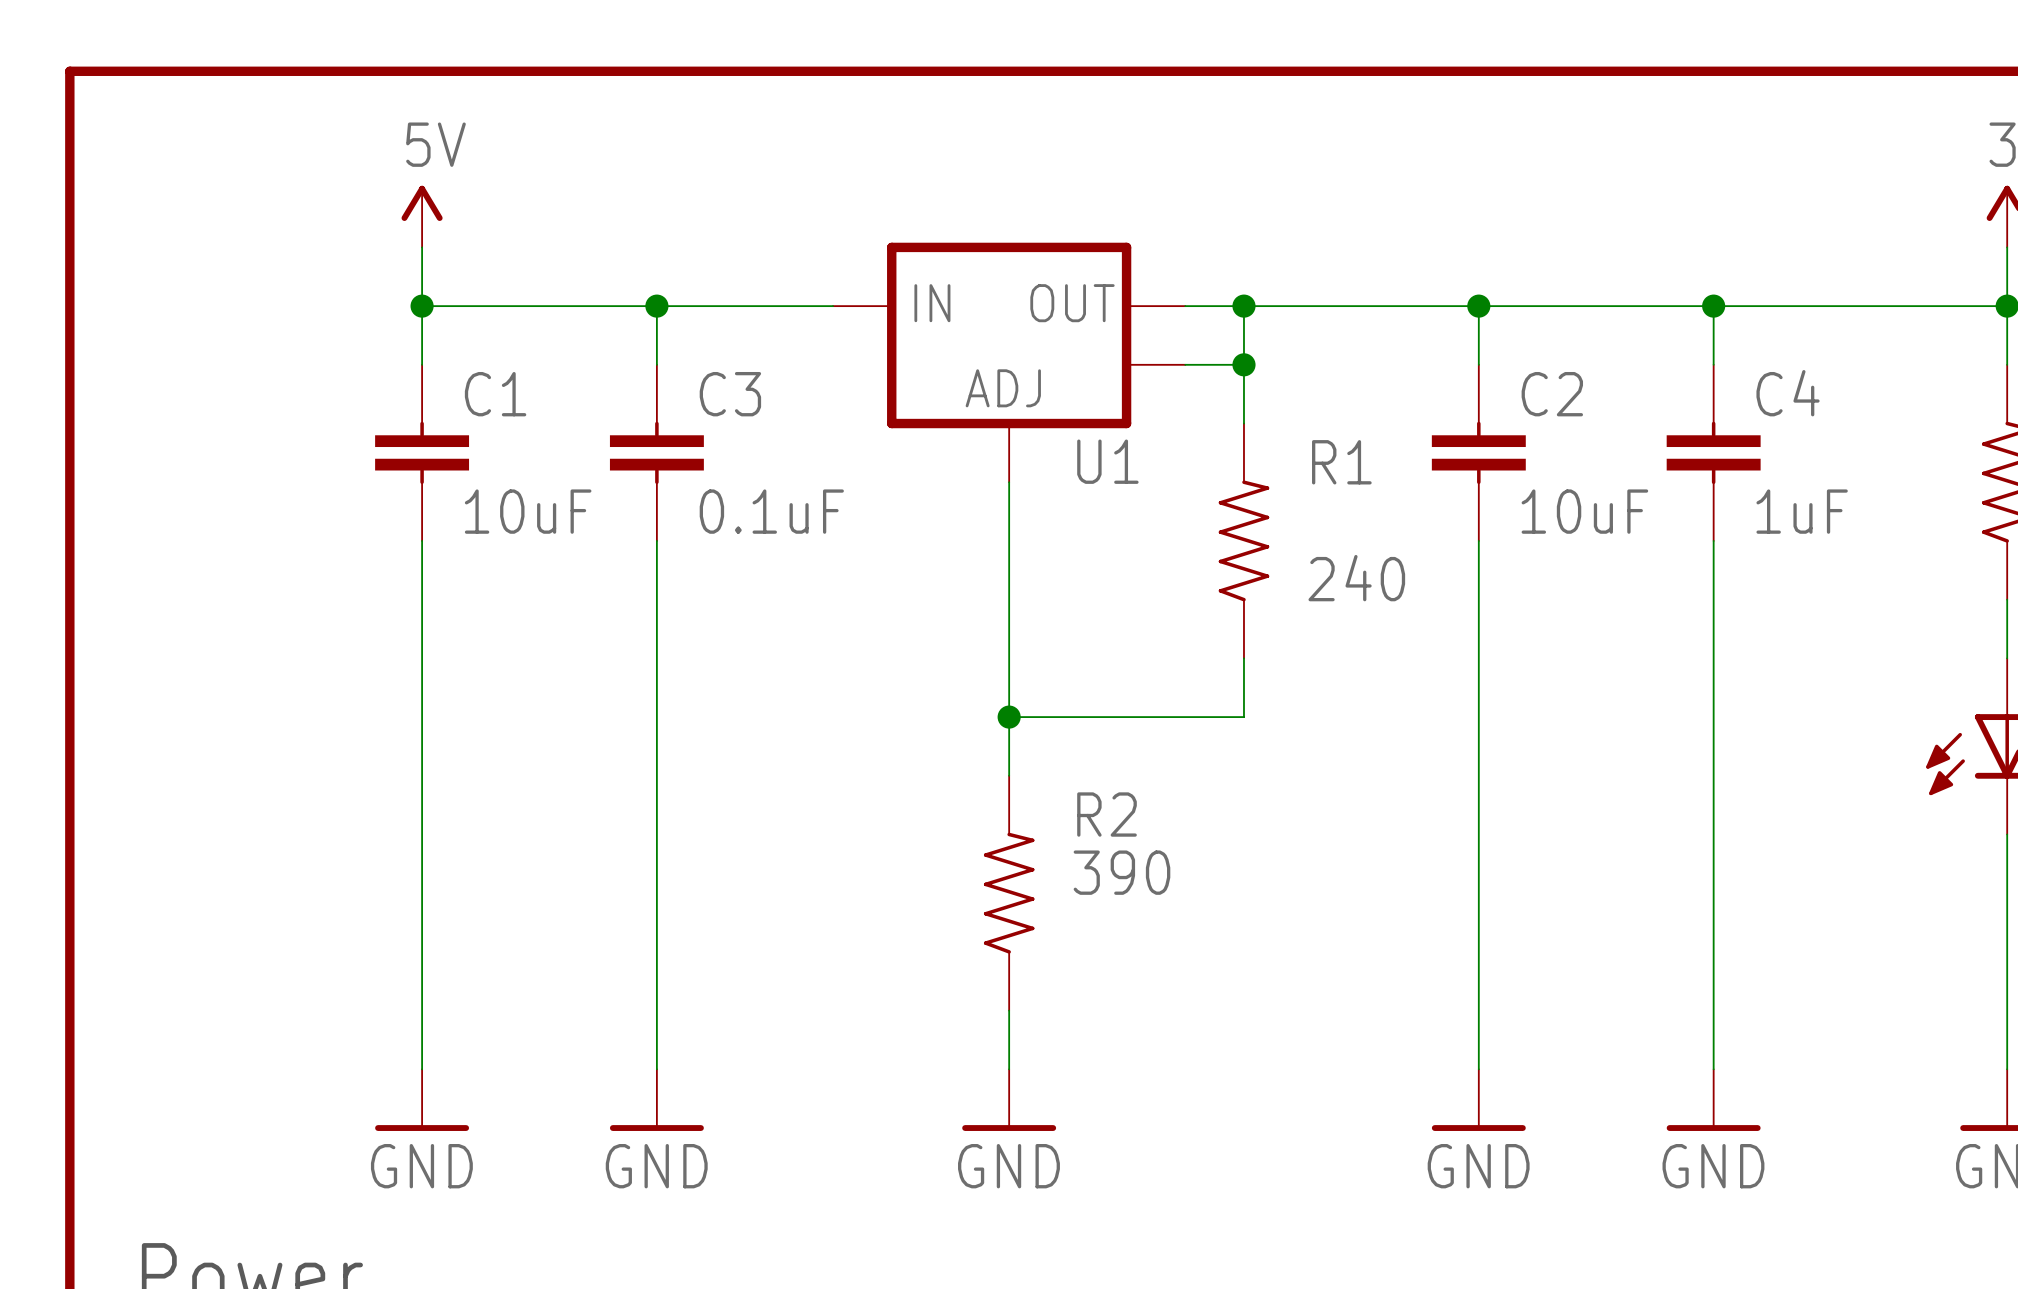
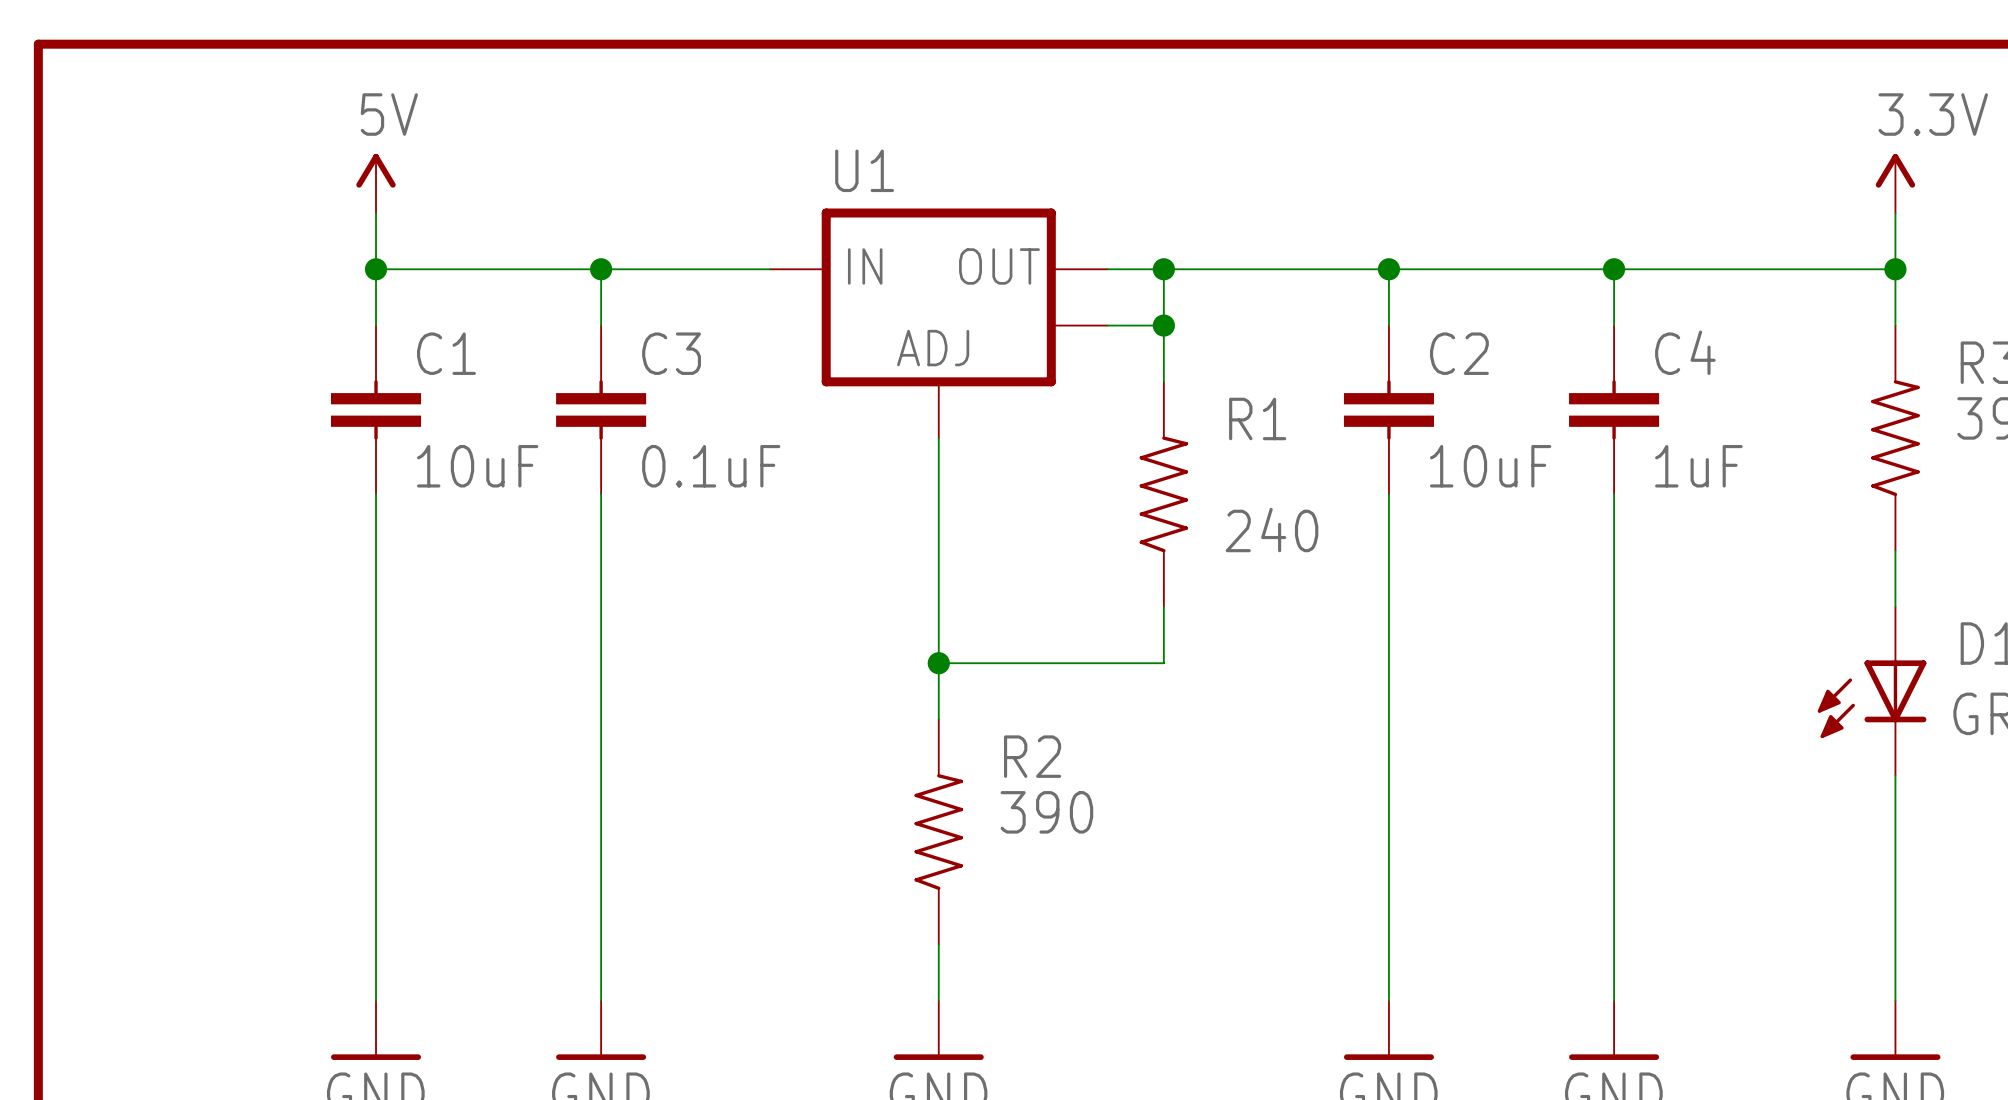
U1 name position: U1 (1107, 461) -> U1 (864, 170)

